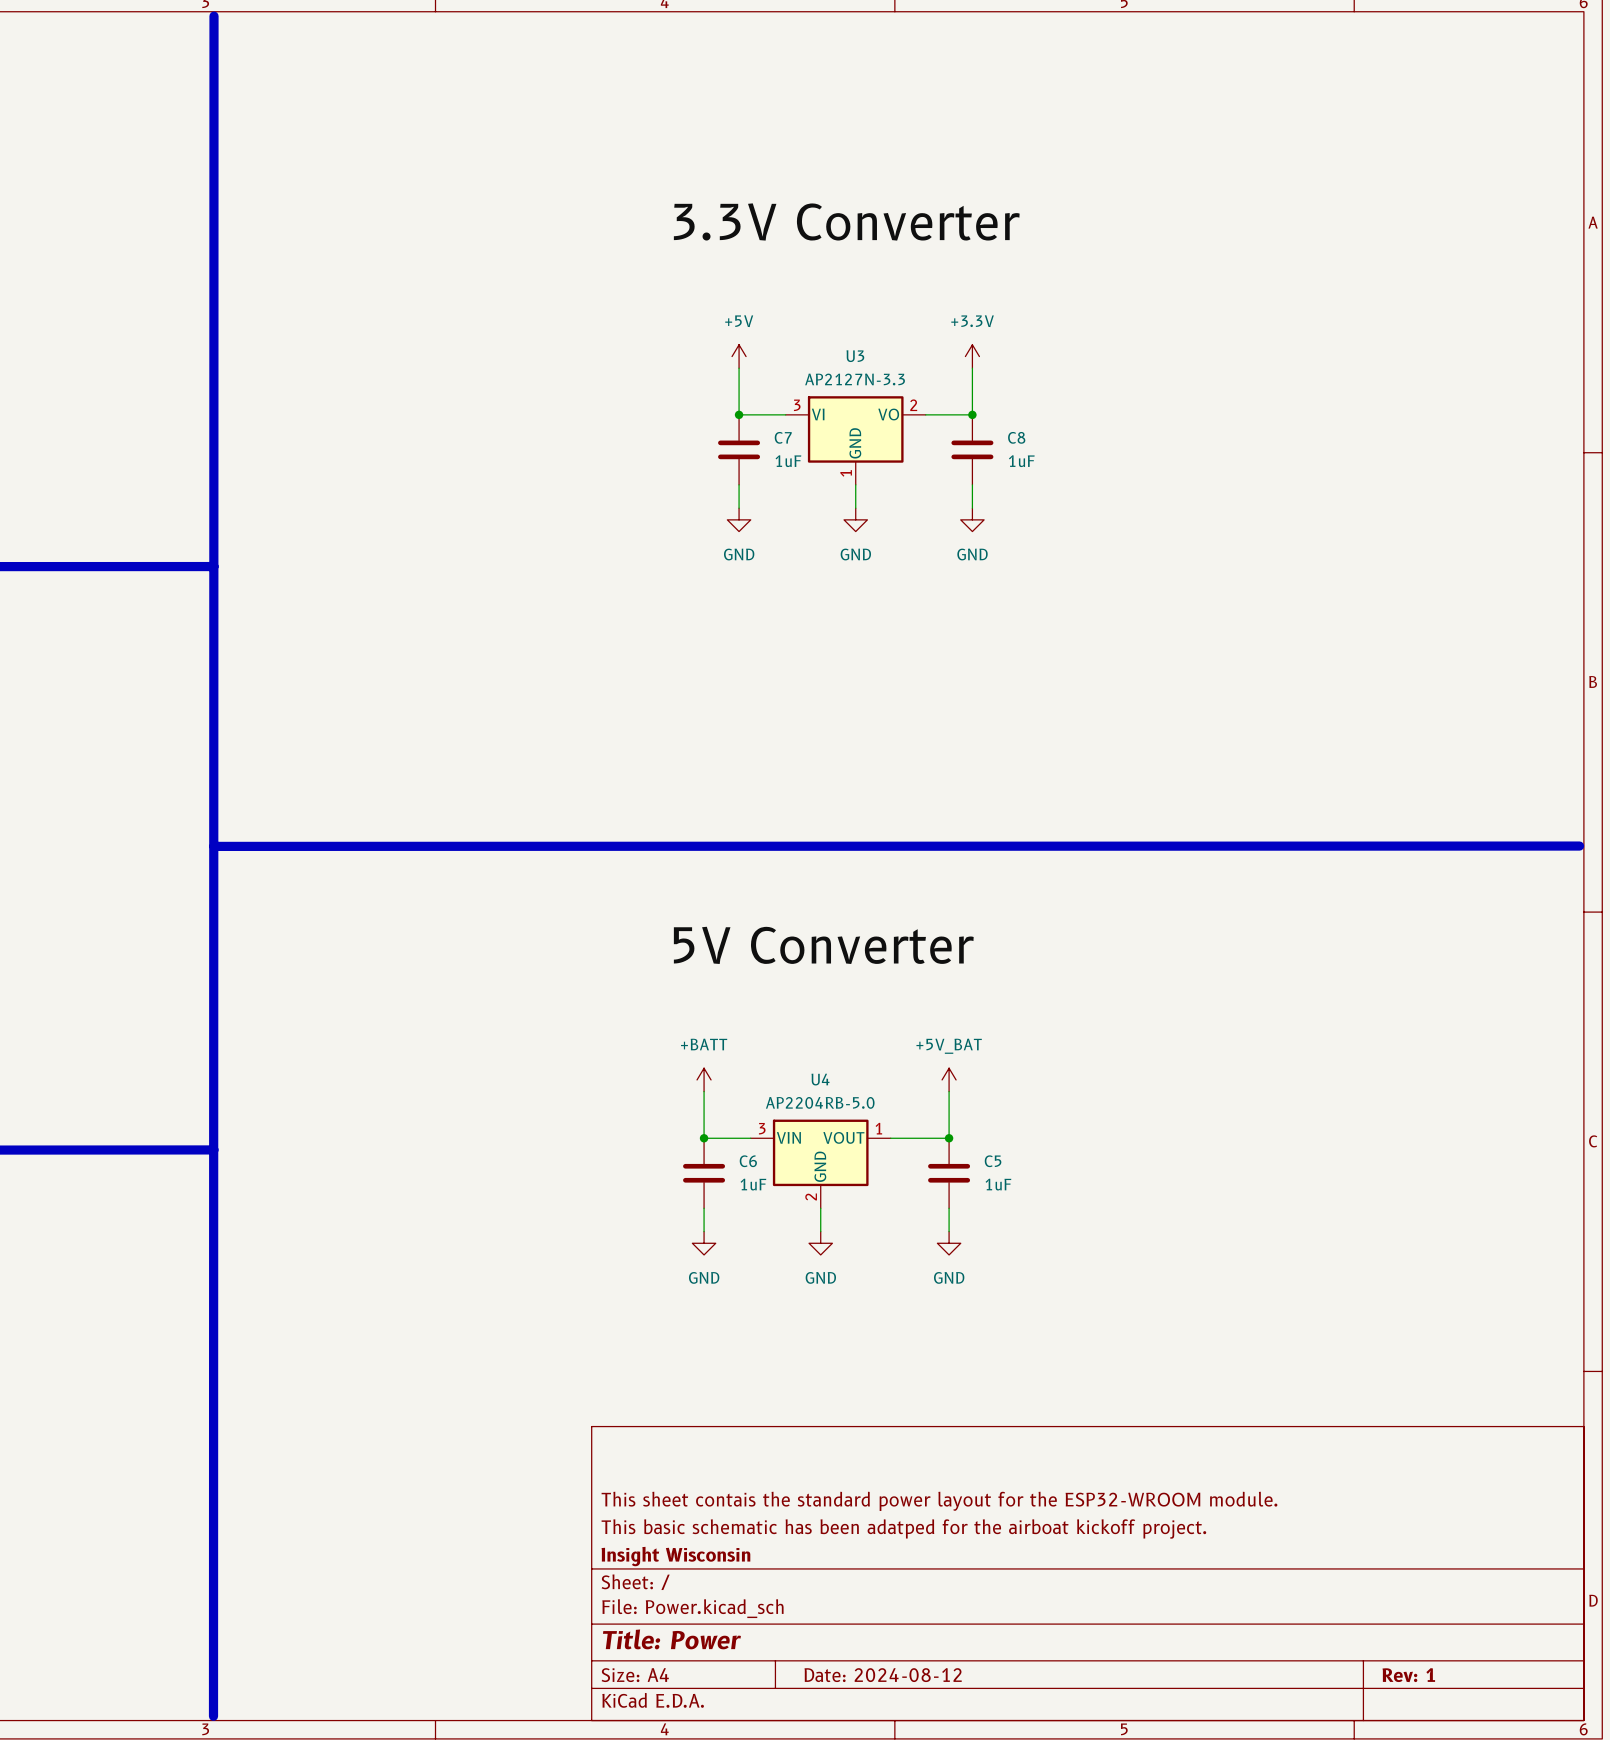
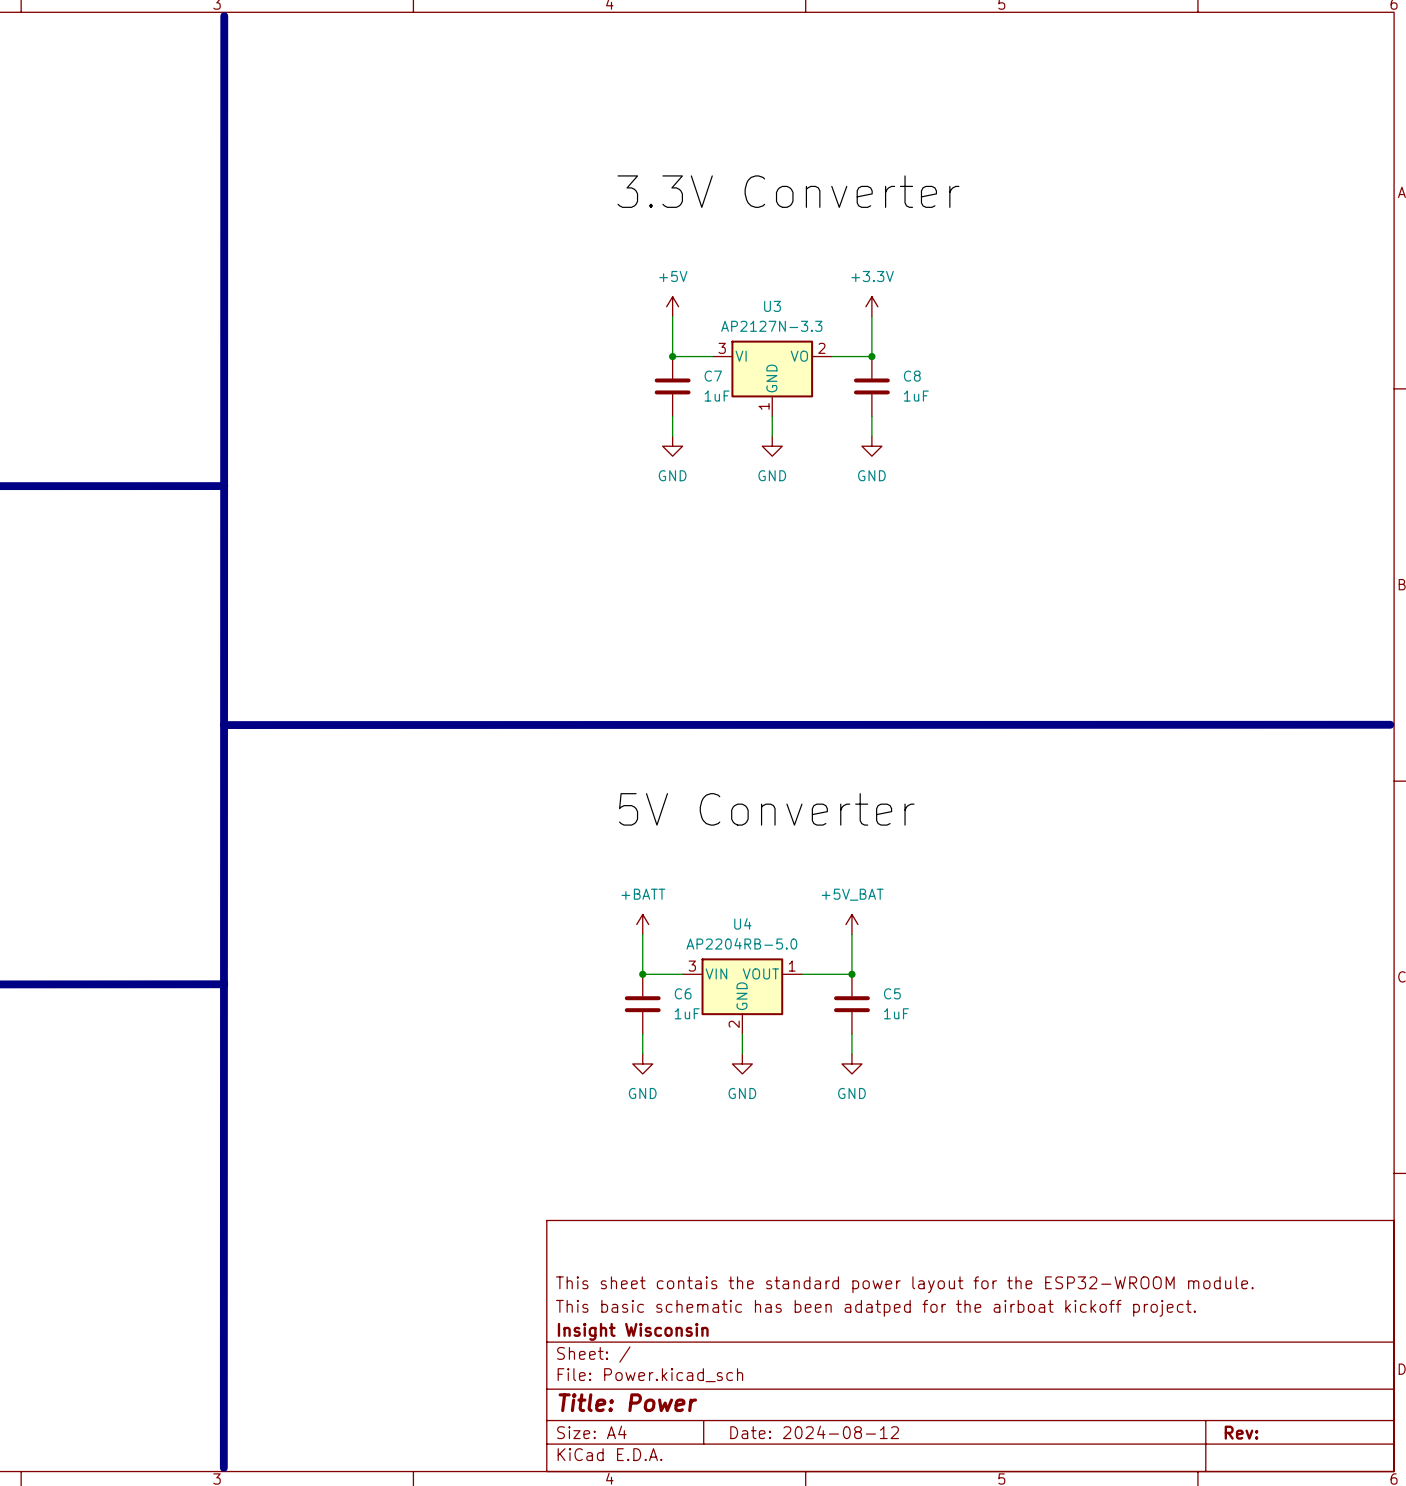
title block: Rev: 1 (1408, 1675) -> Rev: (1241, 1432)

